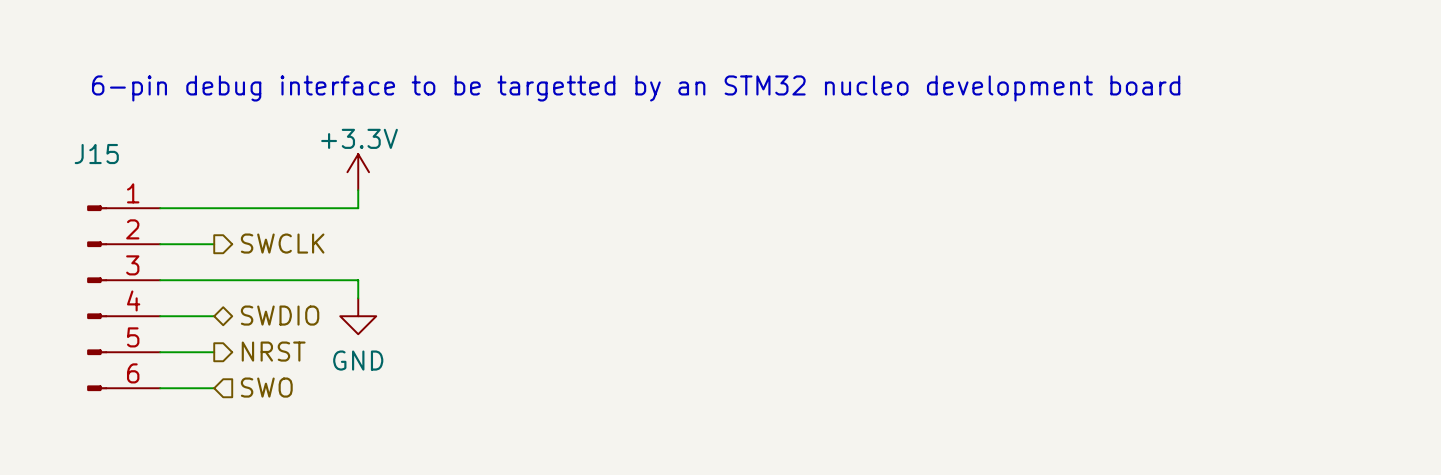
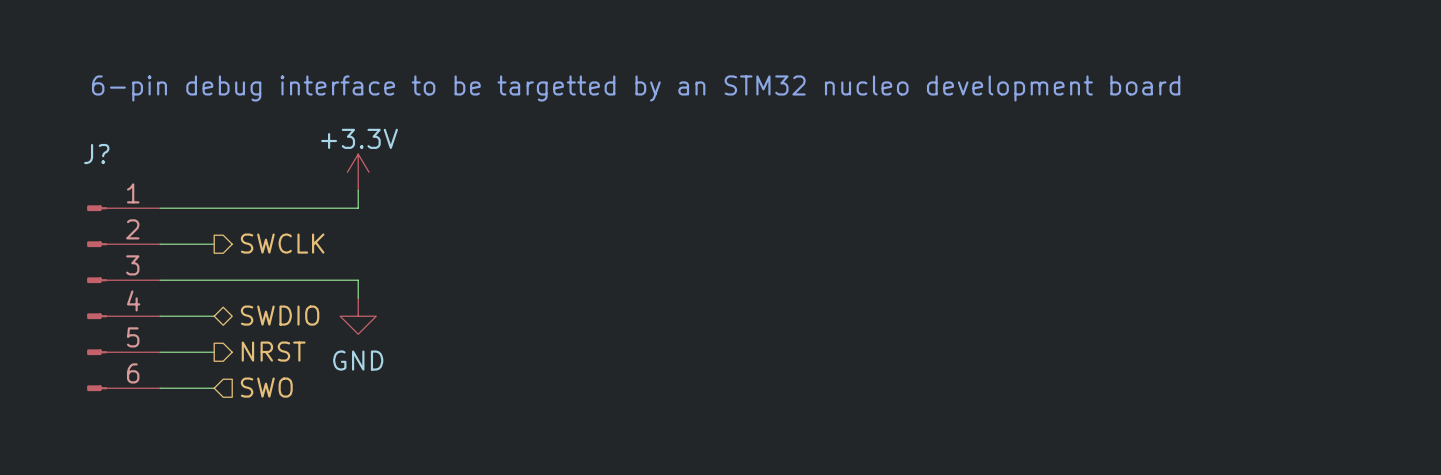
J15 name: J15 (96, 154) -> J? (96, 154)

